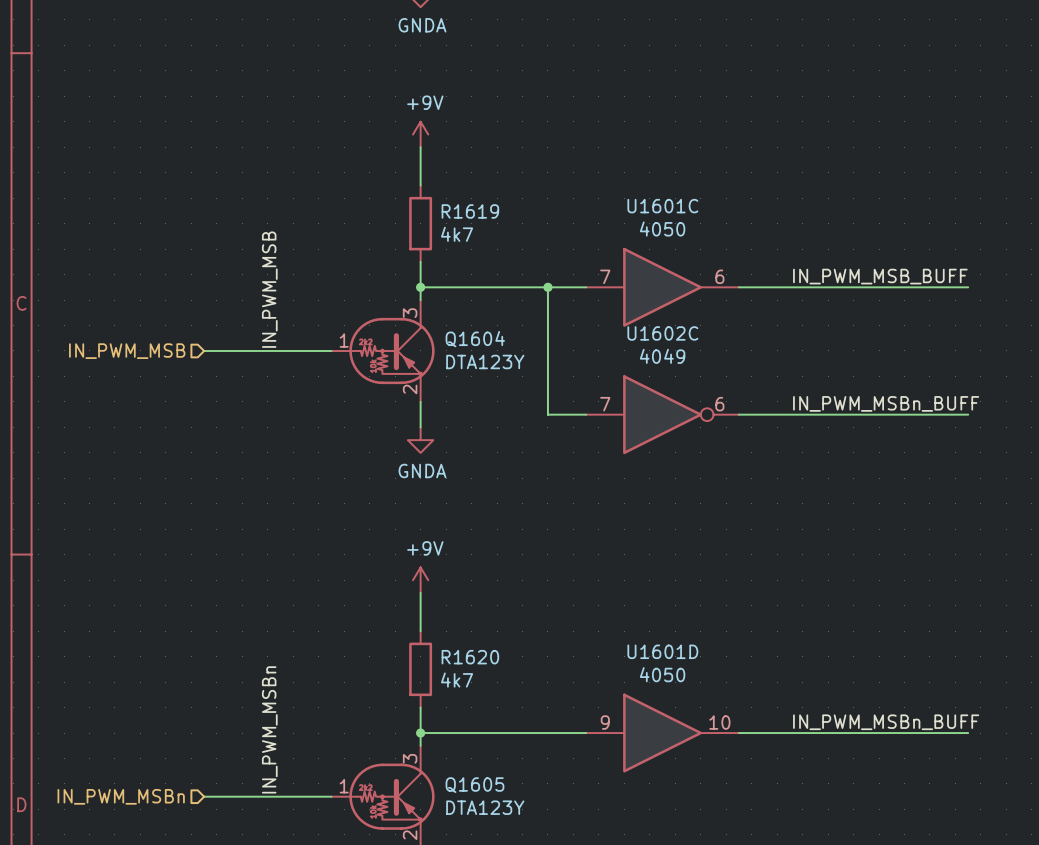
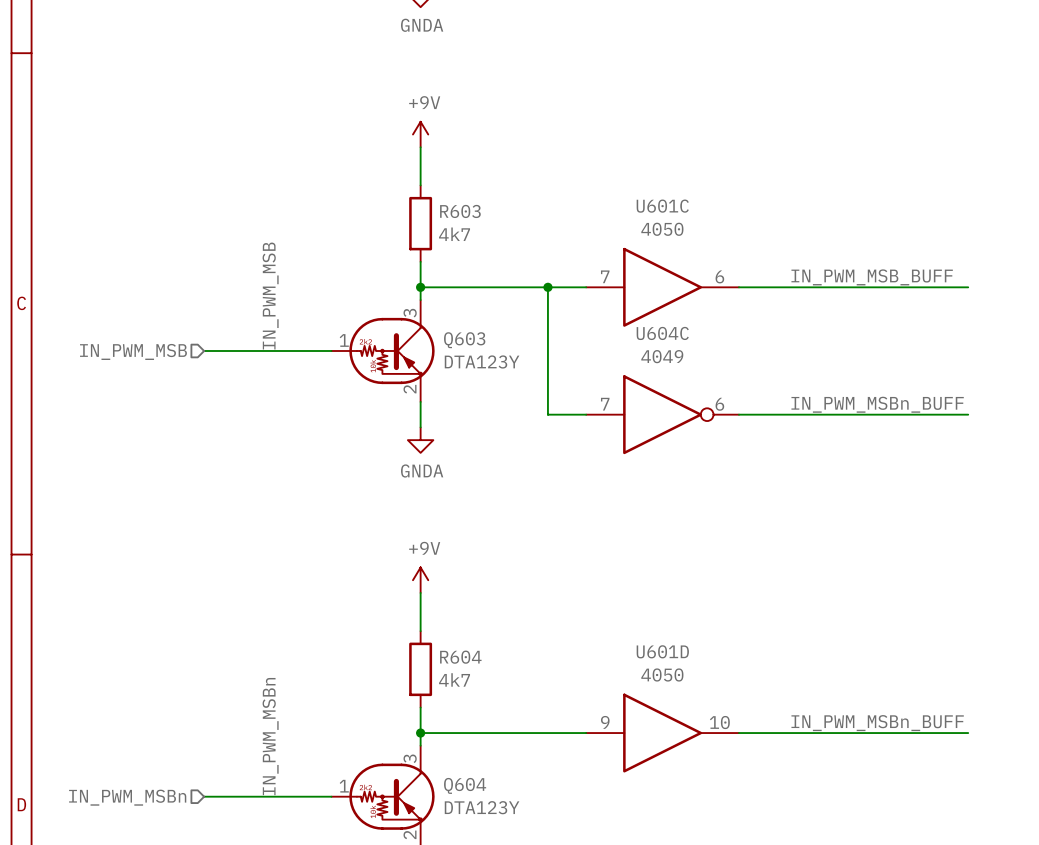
U1601C name: U1601C (662, 206) -> U601C (662, 206)
R1619 name: R1619 (470, 211) -> R603 (460, 211)
U1602C name: U1602C (662, 333) -> U604C (662, 333)
Q1604 name: Q1604 (475, 339) -> Q603 (464, 340)
U1601D name: U1601D (662, 651) -> U601D (662, 651)
R1620 name: R1620 (470, 657) -> R604 (460, 657)
Q1605 name: Q1605 (474, 785) -> Q604 (465, 785)

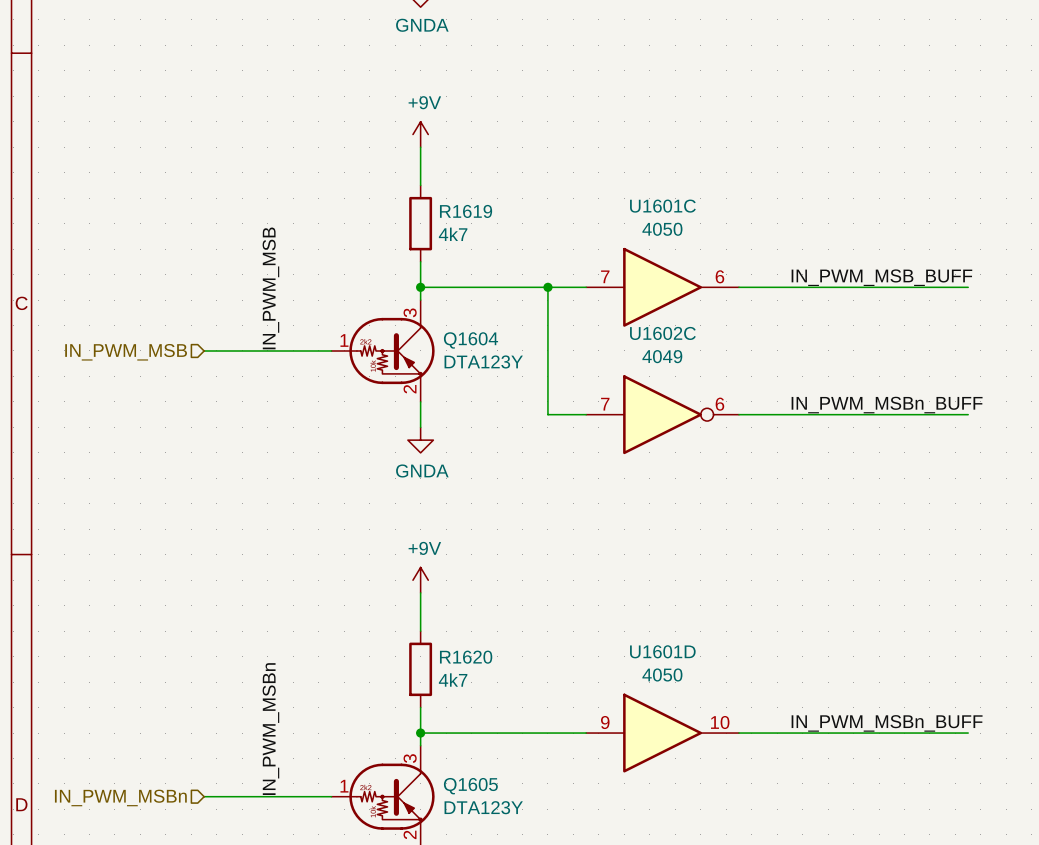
U601C name: U601C (662, 206) -> U1601C (662, 206)
R603 name: R603 (460, 211) -> R1619 (466, 211)
U604C name: U604C (662, 333) -> U1602C (662, 333)
Q603 name: Q603 (464, 340) -> Q1604 (470, 340)
U601D name: U601D (662, 651) -> U1601D (662, 651)
R604 name: R604 (460, 657) -> R1620 (466, 657)
Q604 name: Q604 (465, 785) -> Q1605 (470, 786)

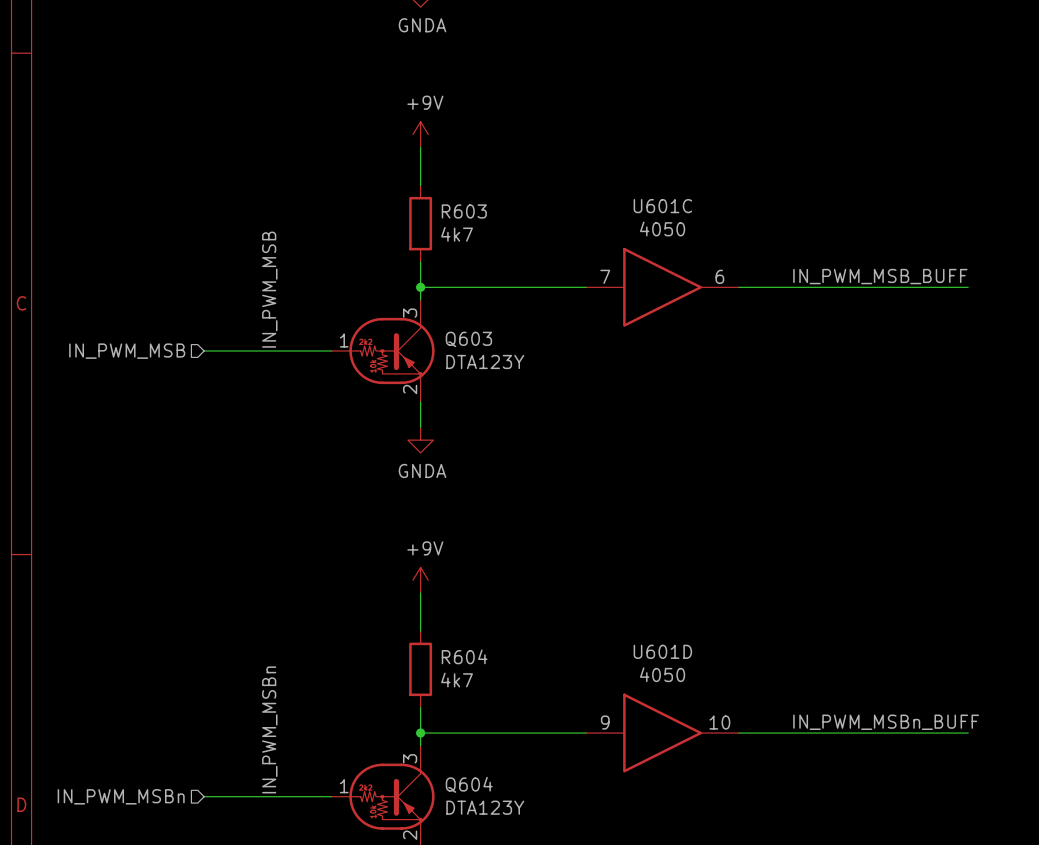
U1601C name: U1601C (662, 206) -> U601C (662, 206)
R1619 name: R1619 (466, 211) -> R603 (464, 211)
wire: (547, 287) (547, 414) (586, 414) -> none
junction: (547, 287) -> none
Q1604 name: Q1604 (470, 340) -> Q603 (468, 339)
label: IN_PWM_MSBn_BUFF (887, 405) -> none
U1602C: 4049 (662, 414) -> none
wire: (738, 414) (968, 414) -> none
U1601D name: U1601D (662, 651) -> U601D (662, 651)
R1620 name: R1620 (466, 657) -> R604 (464, 656)
Q1605 name: Q1605 (470, 786) -> Q604 (469, 784)

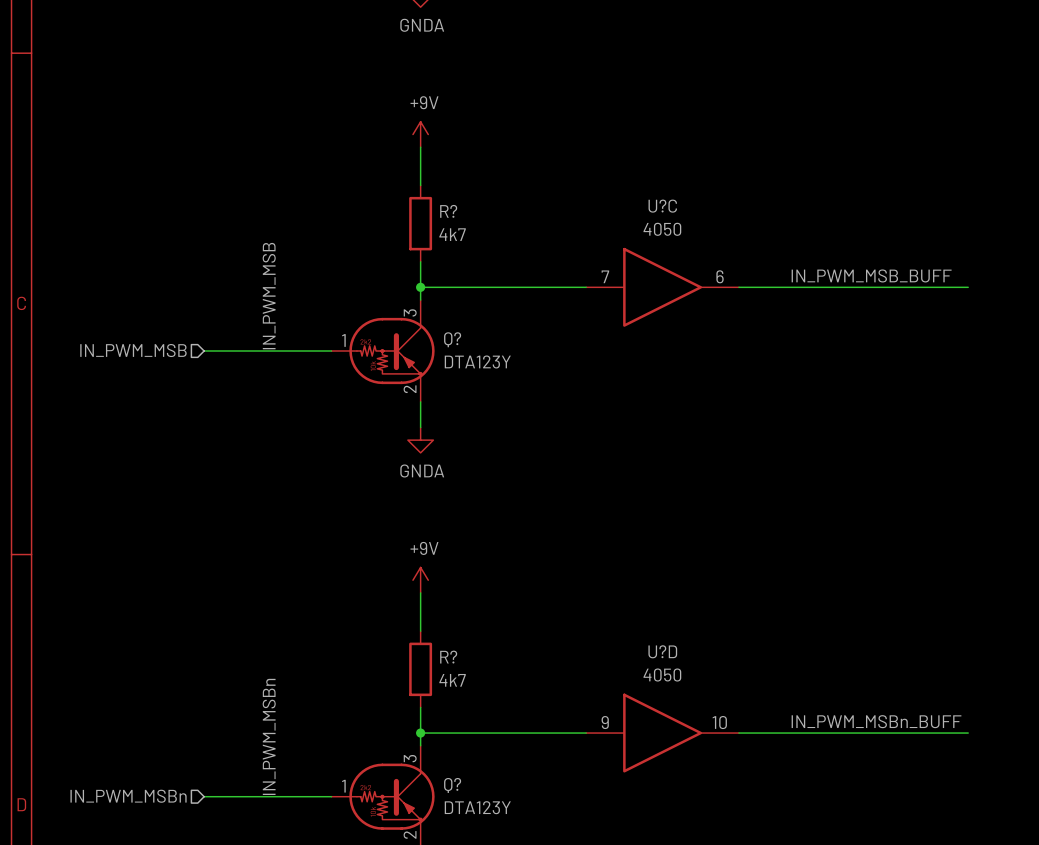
U601C name: U601C (662, 206) -> U?C (662, 206)
R603 name: R603 (464, 211) -> R? (448, 211)
Q603 name: Q603 (468, 339) -> Q? (452, 339)
U601D name: U601D (662, 651) -> U?D (662, 651)
R604 name: R604 (464, 656) -> R? (448, 657)
Q604 name: Q604 (469, 784) -> Q? (452, 785)

